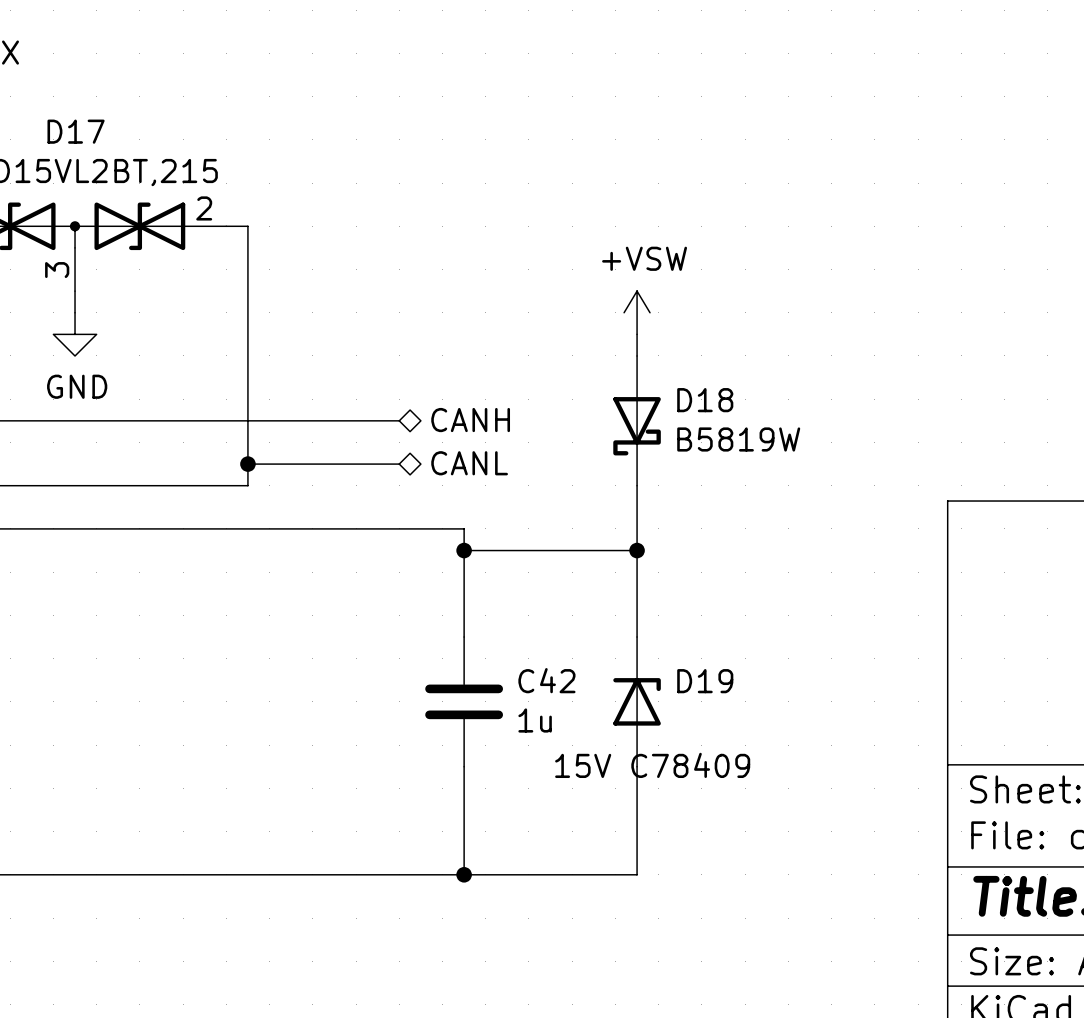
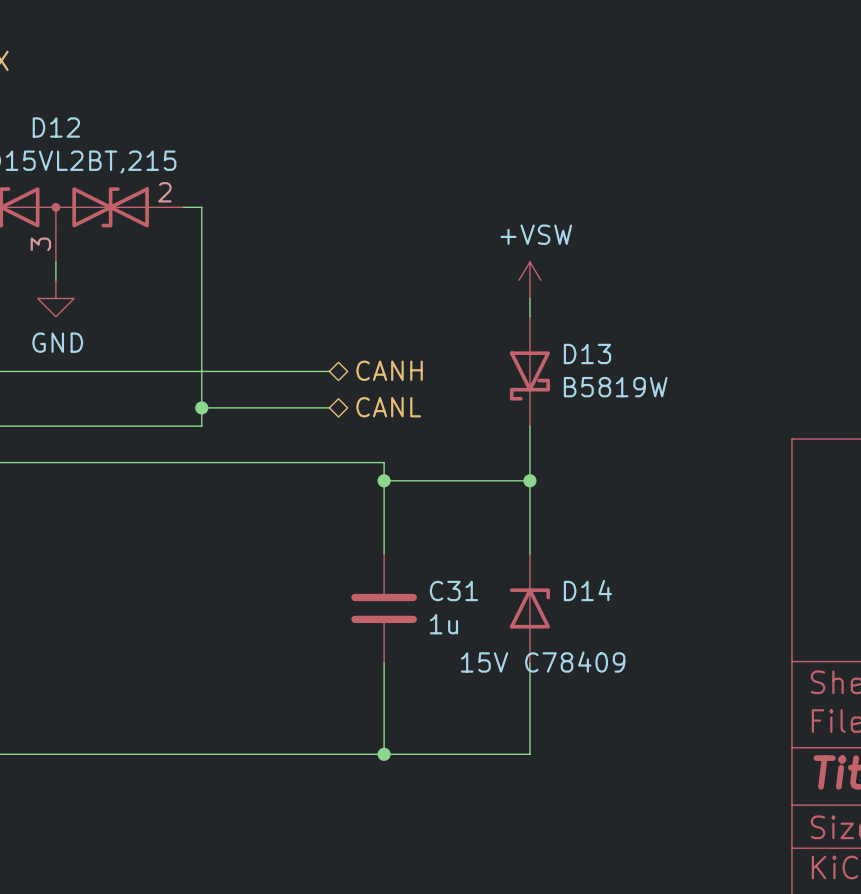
D17 name: D17 (76, 131) -> D12 (56, 127)
D18 name: D18 (705, 400) -> D13 (587, 353)
C42 name: C42 (546, 680) -> C31 (453, 590)
D19 name: D19 (705, 681) -> D14 (587, 590)

